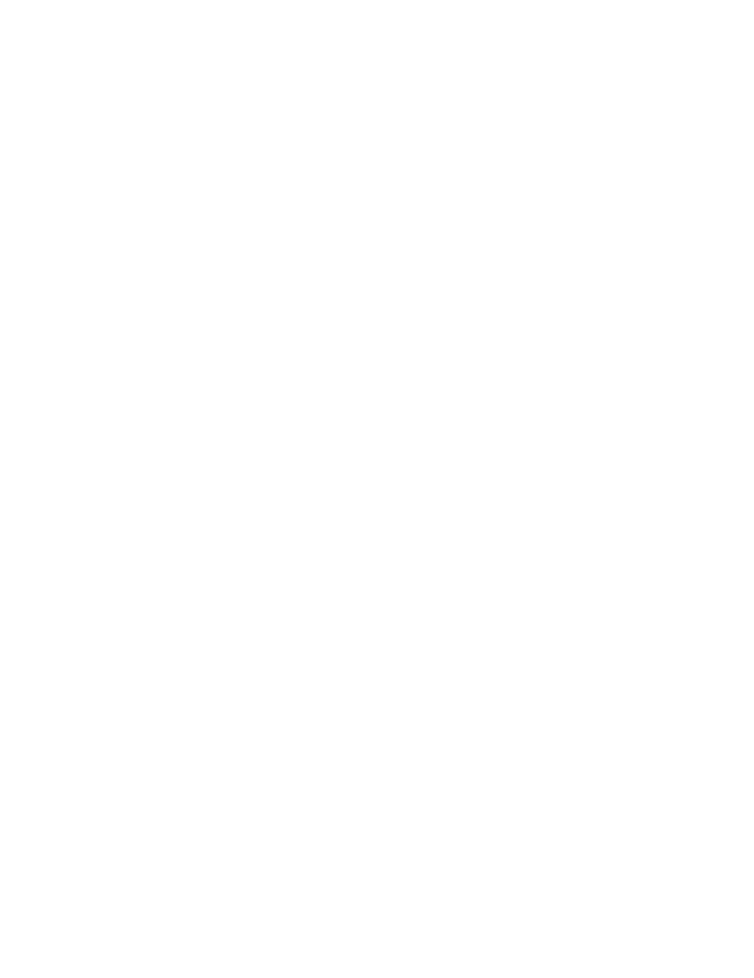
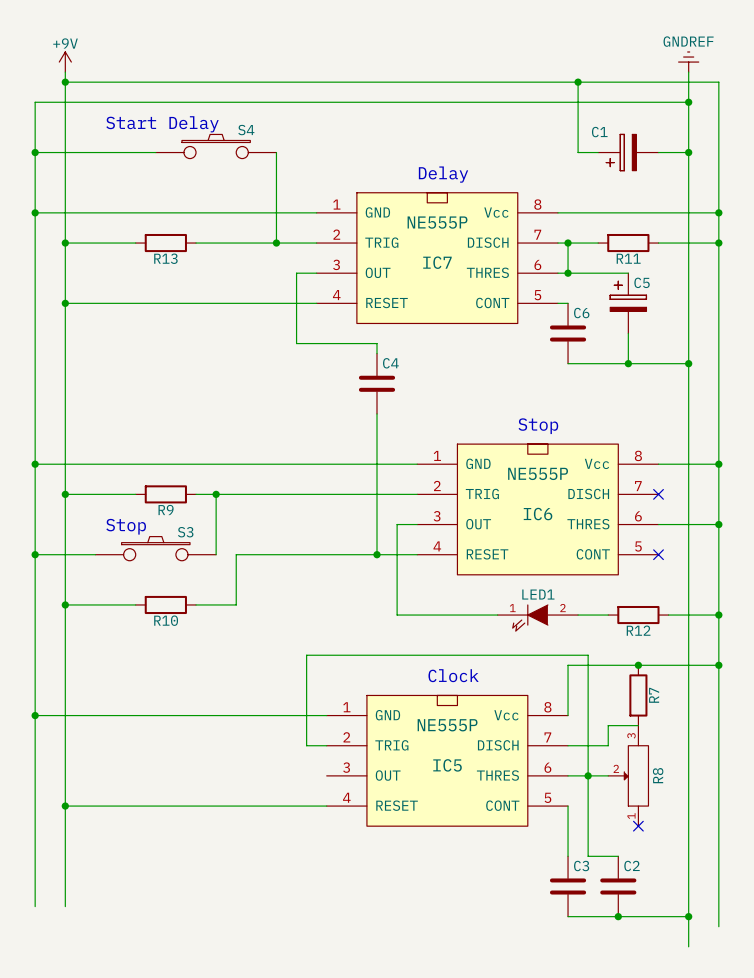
power symbol: none -> +9V (65, 62)
power symbol: none -> GNDREF (688, 62)
wire: none -> (65, 72) (65, 906)
wire: none -> (688, 72) (688, 946)
wire: none -> (65, 82) (718, 82) (718, 926)
junction: none -> (65, 82)
wire: none -> (578, 82) (578, 152) (598, 152)
junction: none -> (578, 82)
wire: none -> (688, 102) (35, 102) (35, 906)
junction: none -> (688, 102)
text: none -> Start Delay (162, 124)
S4: none -> (216, 146)
wire: none -> (35, 152) (155, 152)
junction: none -> (35, 152)
wire: none -> (276, 152) (276, 243)
C1: none -> (628, 152)
wire: none -> (658, 152) (688, 152)
junction: none -> (688, 152)
text: none -> Delay (443, 174)
wire: none -> (35, 212) (316, 212)
junction: none -> (35, 212)
wire: none -> (557, 212) (718, 212)
junction: none -> (718, 212)
wire: none -> (65, 243) (135, 243)
junction: none -> (65, 243)
R13: none -> (165, 243)
wire: none -> (196, 243) (316, 243)
junction: none -> (276, 243)
wire: none -> (557, 243) (598, 243)
wire: none -> (568, 243) (568, 273)
junction: none -> (568, 243)
R11: none -> (628, 243)
wire: none -> (658, 243) (718, 243)
junction: none -> (718, 243)
IC7: none -> NE555P (437, 258)
wire: none -> (316, 273) (296, 273) (296, 343) (377, 343) (377, 353)
wire: none -> (557, 273) (628, 273)
junction: none -> (568, 273)
wire: none -> (65, 303) (316, 303)
junction: none -> (65, 303)
wire: none -> (557, 303) (568, 303)
C5: none -> (628, 303)
C6: none -> (568, 333)
wire: none -> (628, 333) (628, 363)
wire: none -> (568, 363) (688, 363)
junction: none -> (628, 363)
junction: none -> (688, 363)
C4: none -> (377, 383)
wire: none -> (377, 413) (377, 554)
text: none -> Stop (538, 426)
wire: none -> (35, 464) (417, 464)
junction: none -> (35, 464)
wire: none -> (658, 464) (718, 464)
junction: none -> (718, 464)
wire: none -> (65, 494) (135, 494)
junction: none -> (65, 494)
R9: none -> (165, 494)
wire: none -> (196, 494) (417, 494)
wire: none -> (216, 494) (216, 554)
junction: none -> (216, 494)
no-connect mark: none -> (658, 494)
IC6: none -> NE555P (537, 509)
wire: none -> (417, 524) (397, 524) (397, 615) (497, 615)
wire: none -> (658, 524) (718, 524)
junction: none -> (718, 524)
text: none -> Stop (126, 526)
S3: none -> (155, 548)
wire: none -> (35, 554) (95, 554)
junction: none -> (35, 554)
junction: none -> (377, 554)
wire: none -> (417, 554) (236, 554) (236, 604) (196, 604)
no-connect mark: none -> (658, 554)
wire: none -> (65, 604) (135, 604)
junction: none -> (65, 604)
R10: none -> (165, 604)
wire: none -> (578, 615) (608, 615)
R12: none -> (638, 615)
wire: none -> (668, 615) (718, 615)
junction: none -> (718, 615)
LED1: none -> (537, 618)
junction: none -> (638, 665)
wire: none -> (718, 665) (568, 665) (568, 715)
junction: none -> (718, 665)
text: none -> Clock (453, 675)
R7: none -> (638, 695)
wire: none -> (35, 715) (326, 715)
junction: none -> (35, 715)
wire: none -> (638, 725) (608, 725) (608, 745) (568, 745)
wire: none -> (326, 745) (306, 745) (306, 655) (588, 655) (588, 856) (618, 856)
IC5: none -> NE555P (447, 760)
wire: none -> (568, 775) (608, 775)
junction: none -> (588, 775)
R8: none -> (628, 775)
wire: none -> (65, 806) (326, 806)
junction: none -> (65, 806)
wire: none -> (568, 806) (568, 856)
no-connect mark: none -> (638, 826)
C3: none -> (568, 886)
C2: none -> (618, 886)
wire: none -> (568, 916) (688, 916)
junction: none -> (618, 916)
junction: none -> (688, 916)

